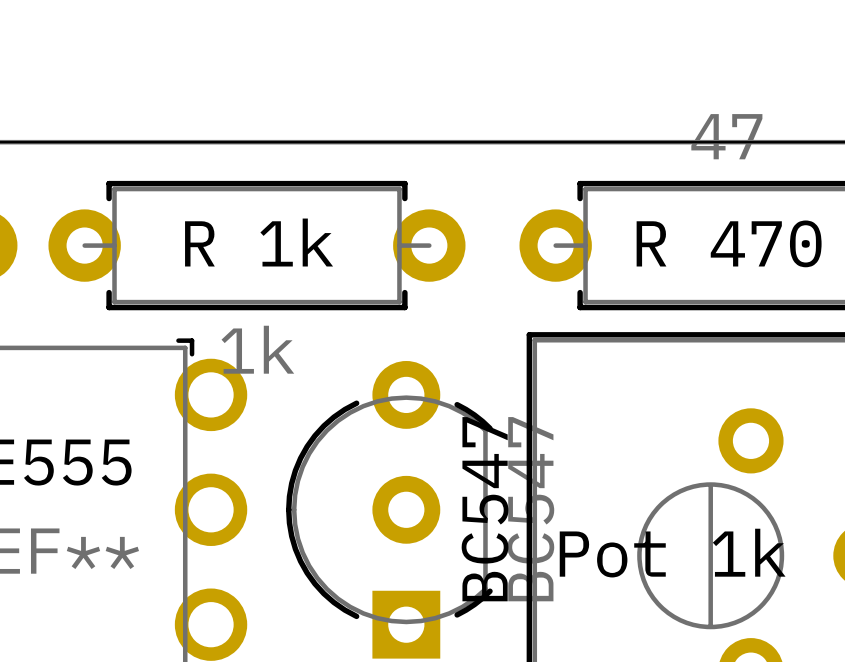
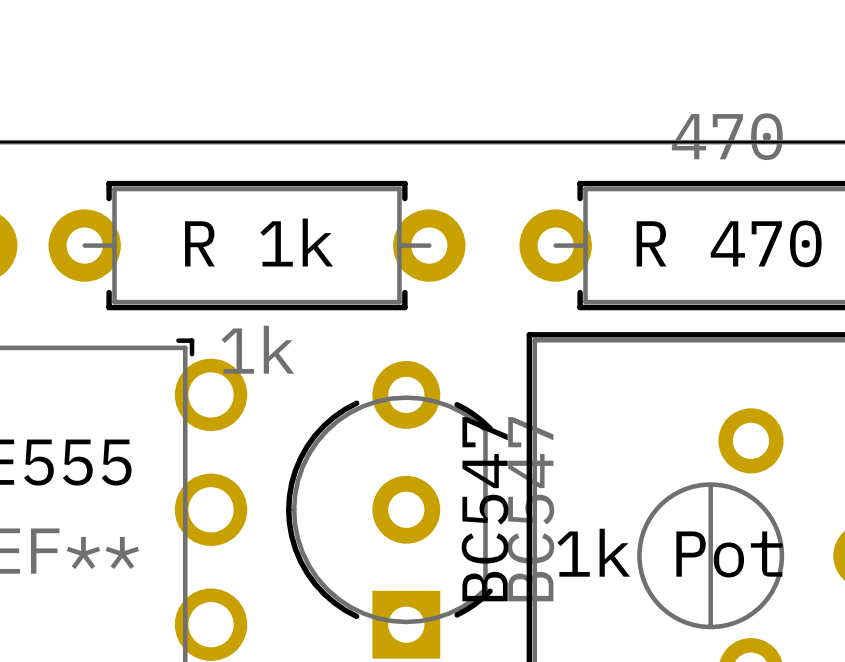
R 470 value: 47 (726, 136) -> 470 (727, 136)
Pot 1k name: Pot 1k (672, 553) -> 1k Pot (669, 553)

